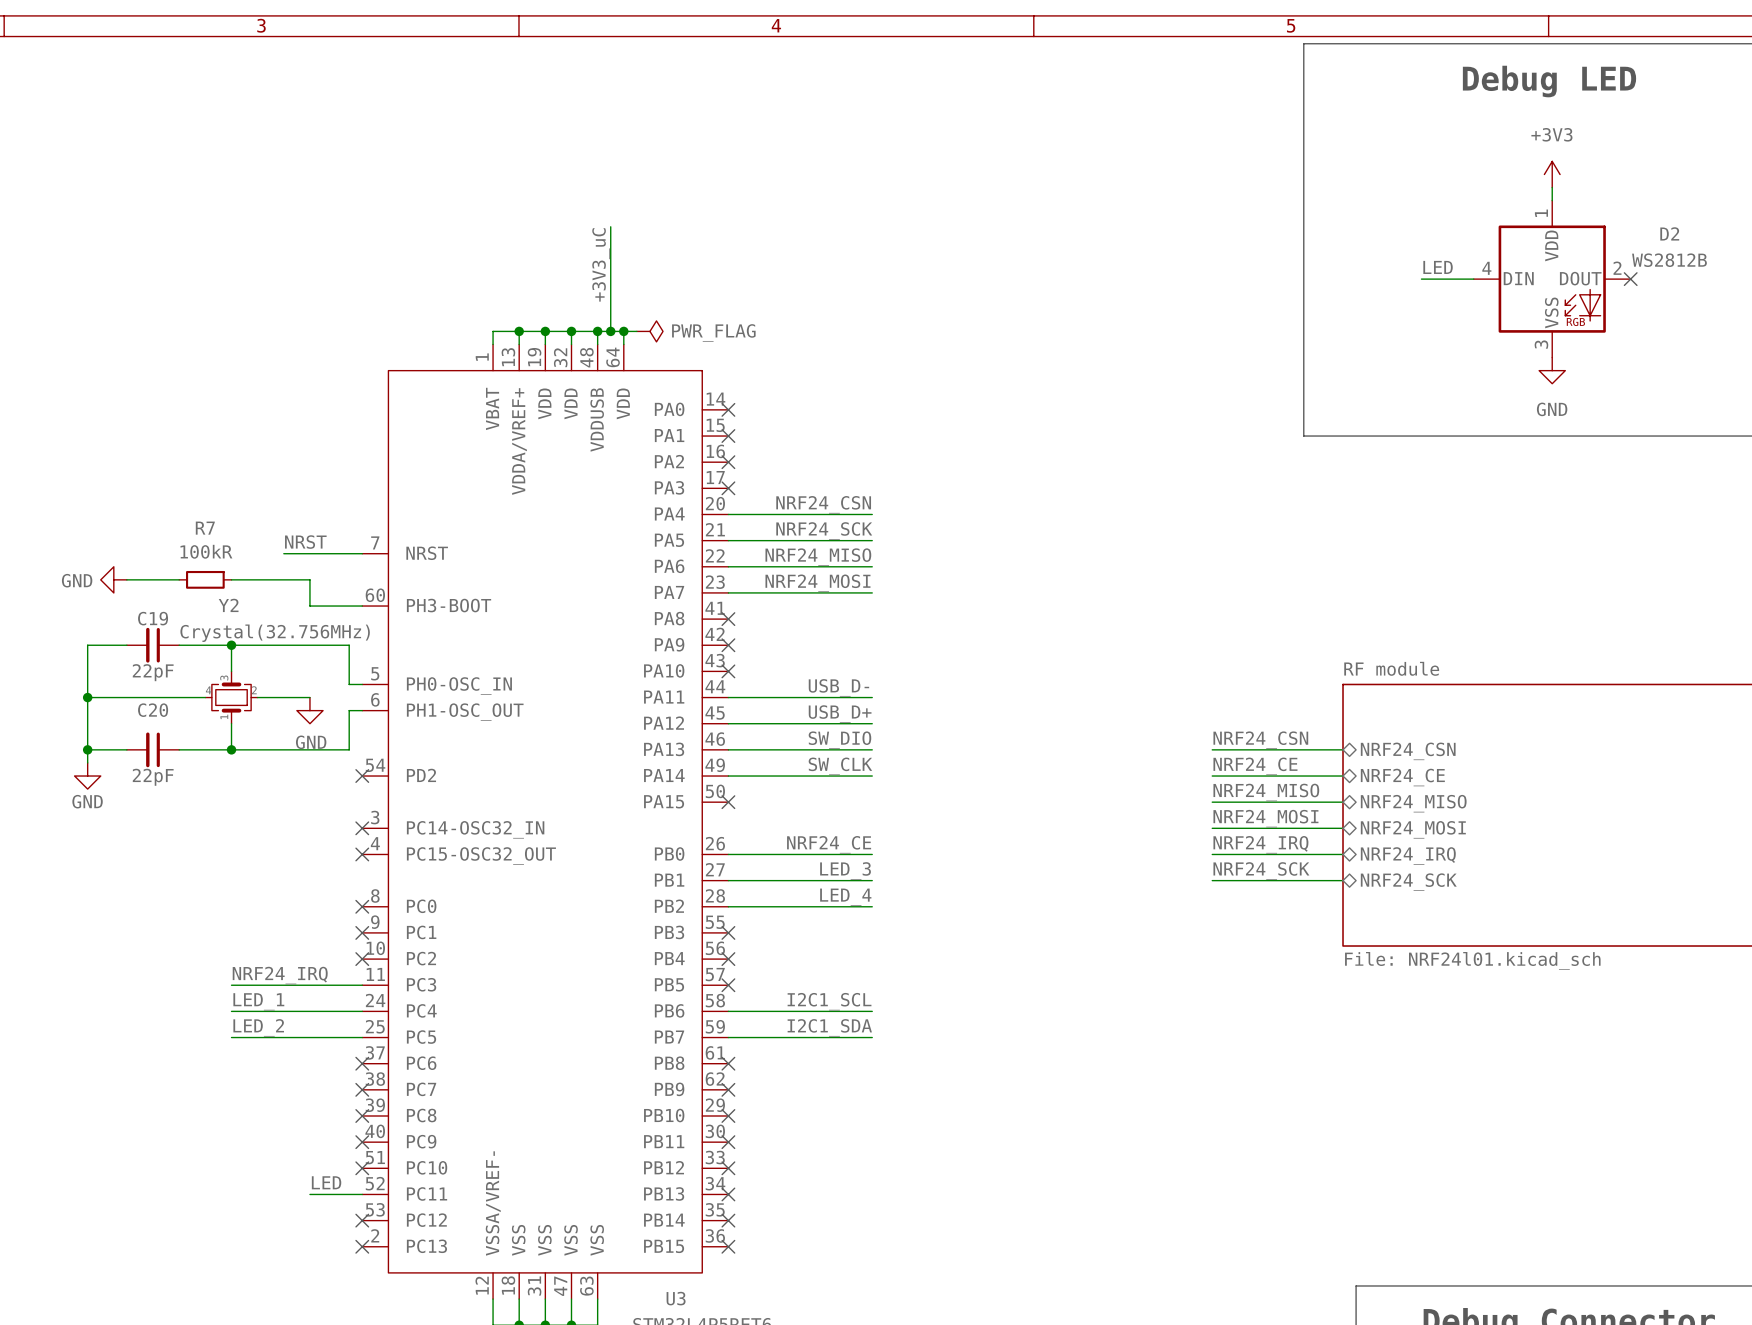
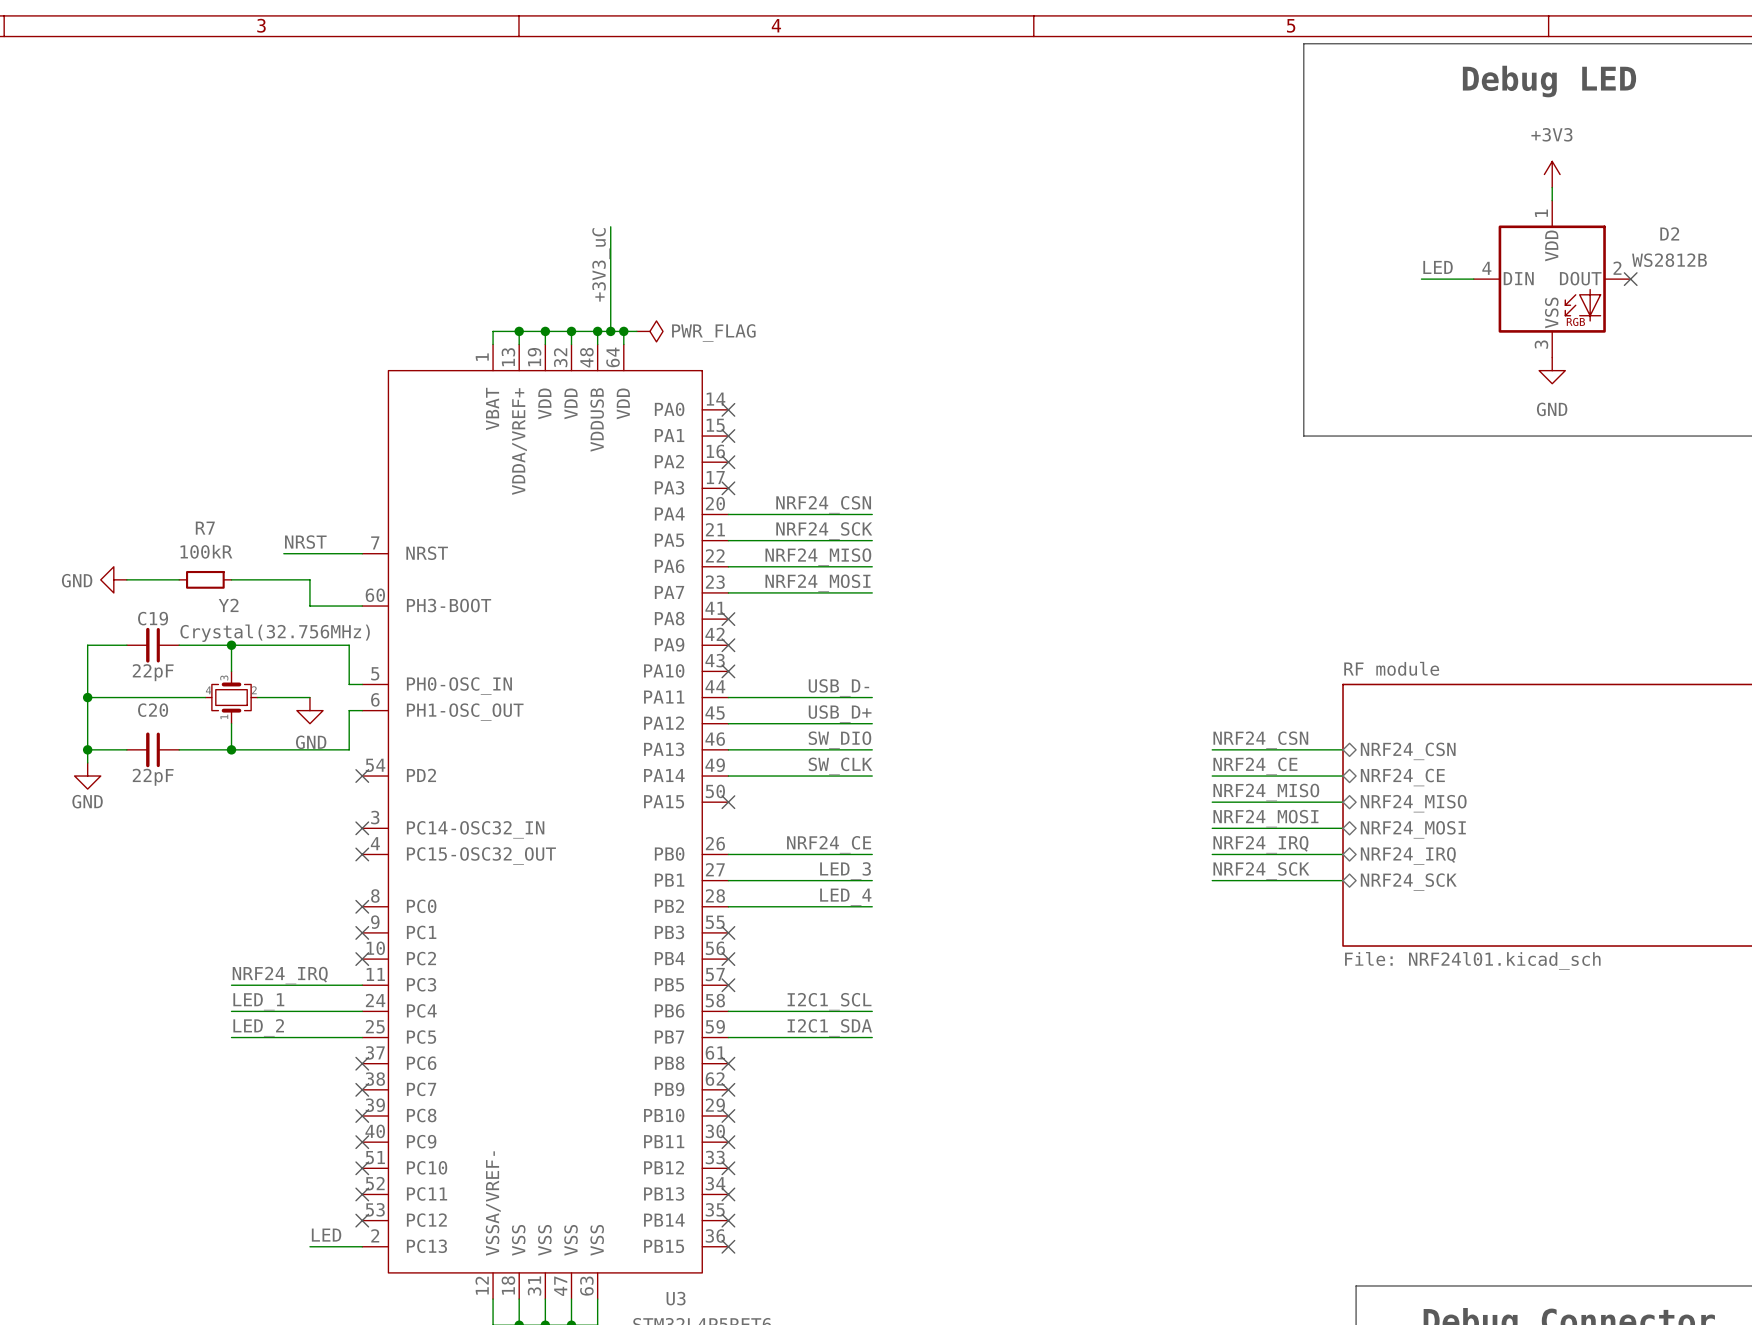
label position: LED (326, 1182) -> LED (326, 1235)
wire: (309, 1194) (362, 1194) -> (309, 1246) (362, 1246)
no-connect mark position: (362, 1246) -> (362, 1194)

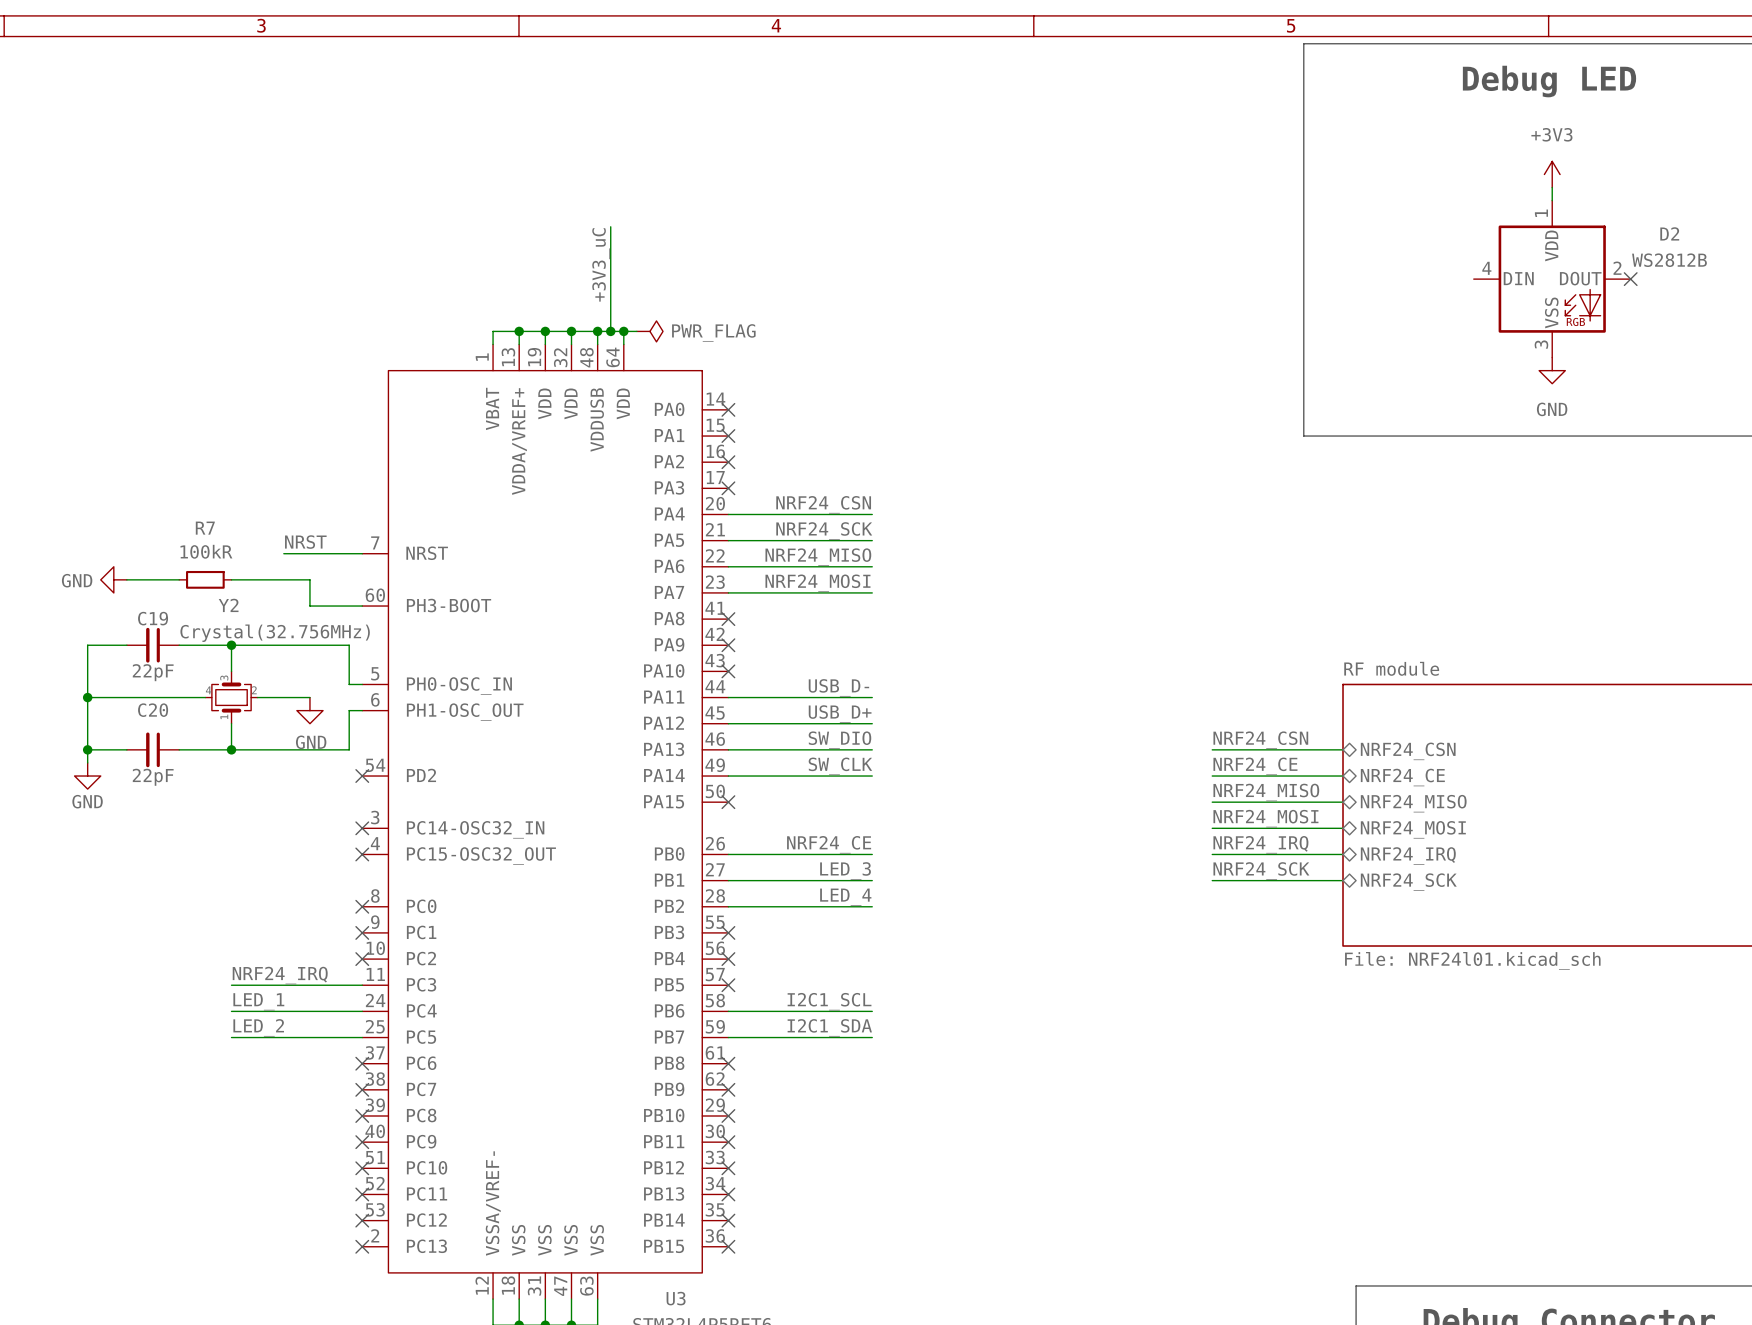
label: LED (1438, 267) -> none
wire: (1421, 279) (1473, 279) -> none
label: LED (326, 1235) -> none
wire: (309, 1246) (362, 1246) -> none
no-connect mark: none -> (362, 1246)

